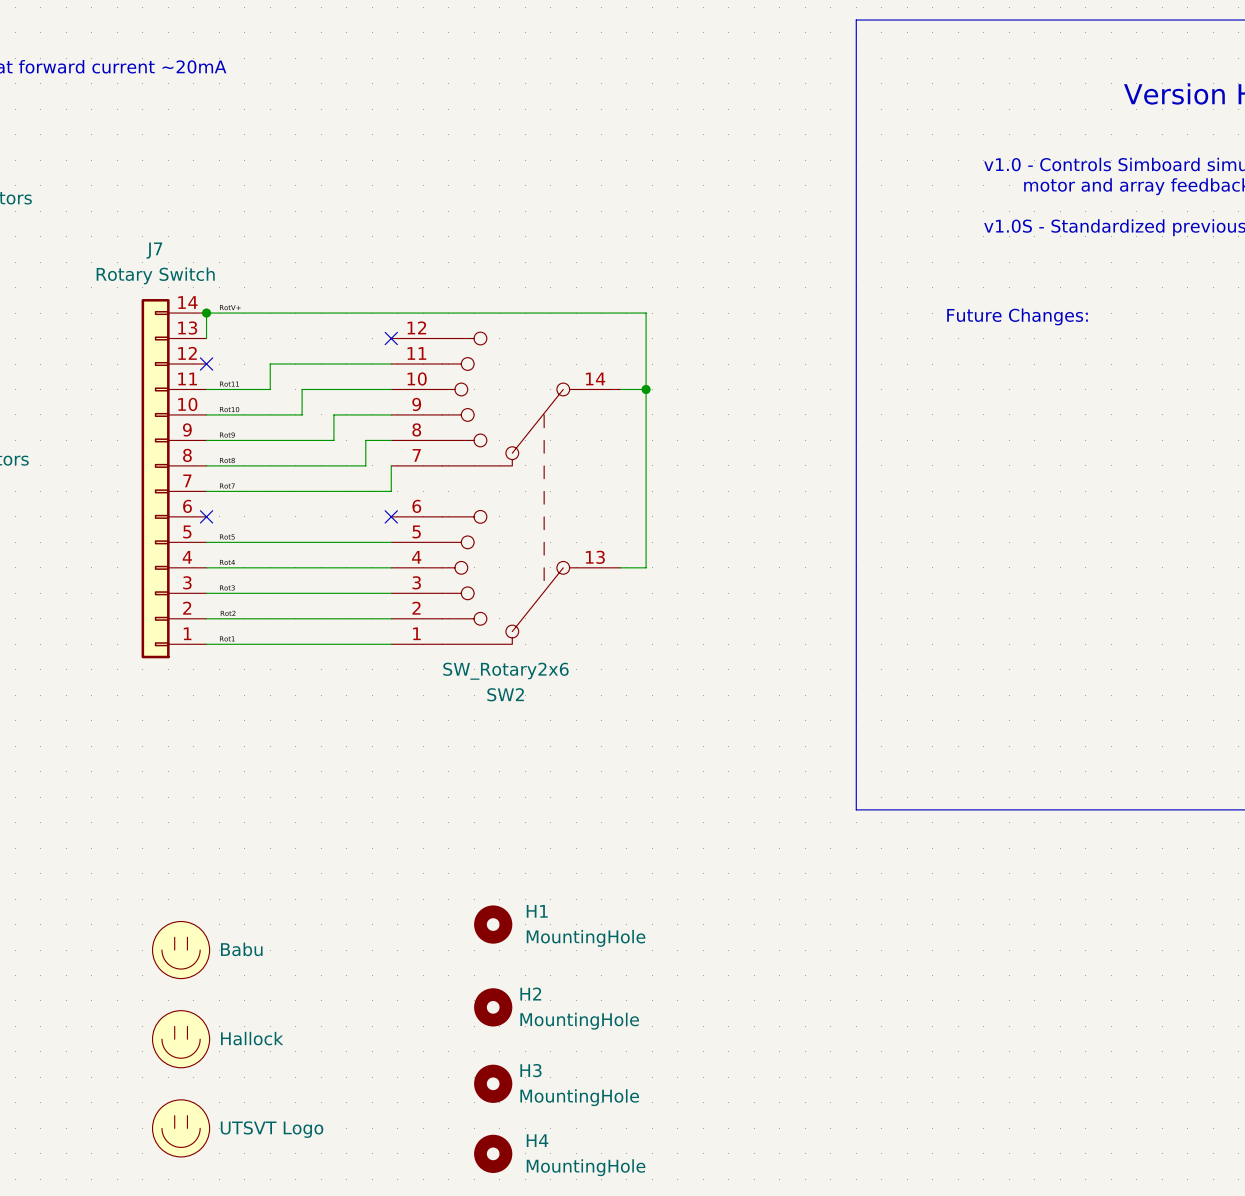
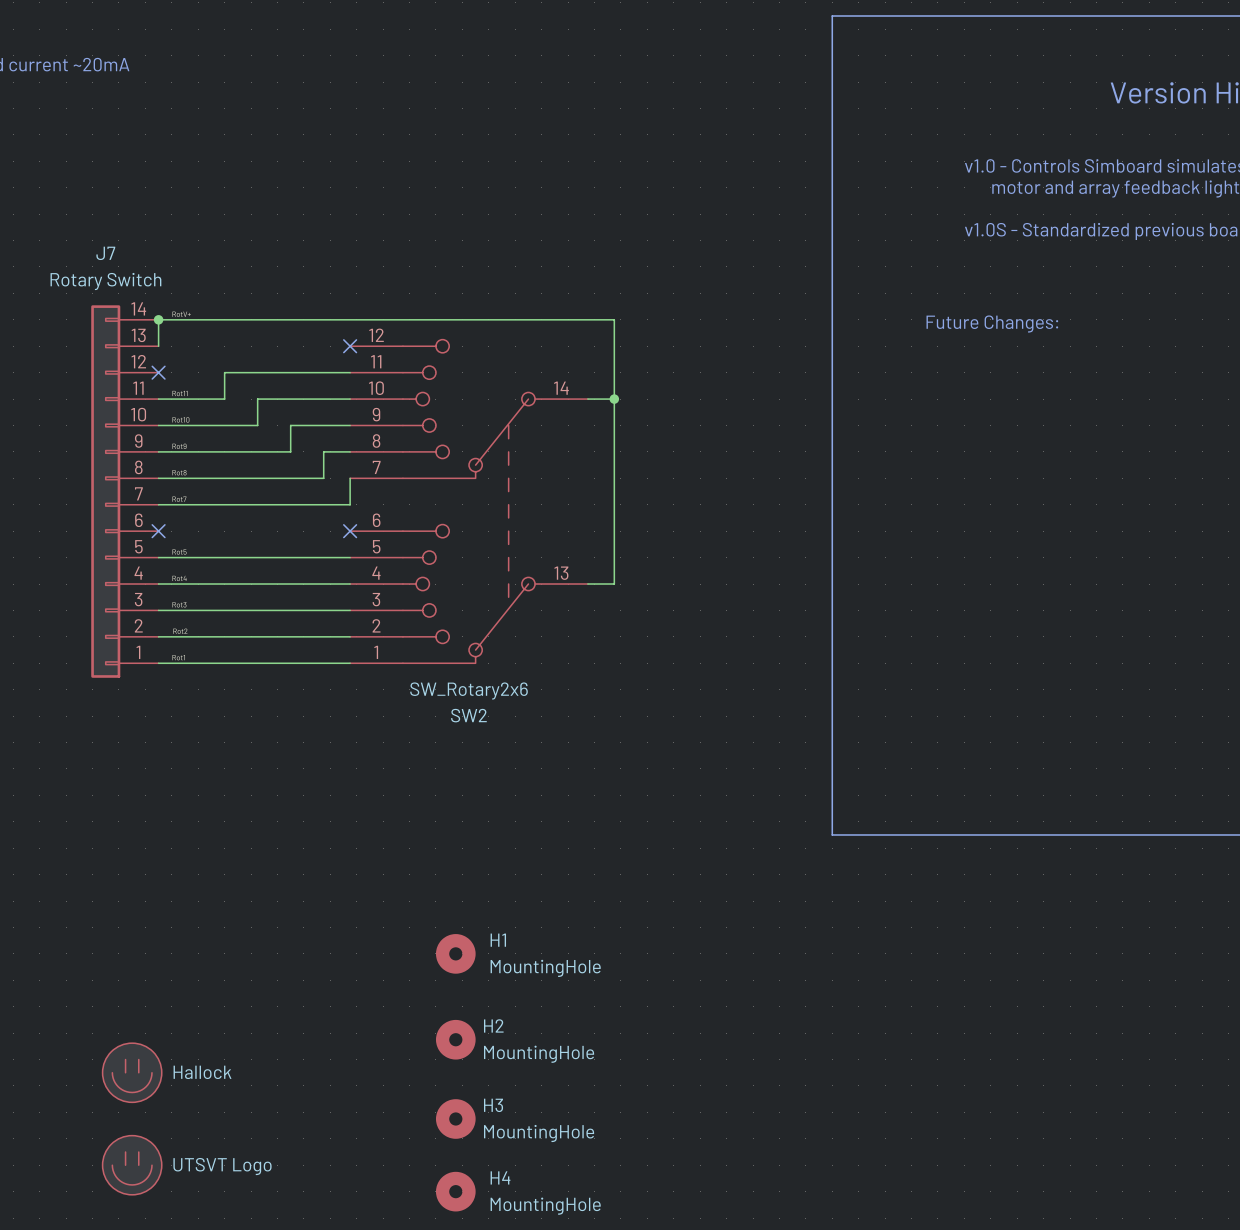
part: Babu (181, 950) -> none

